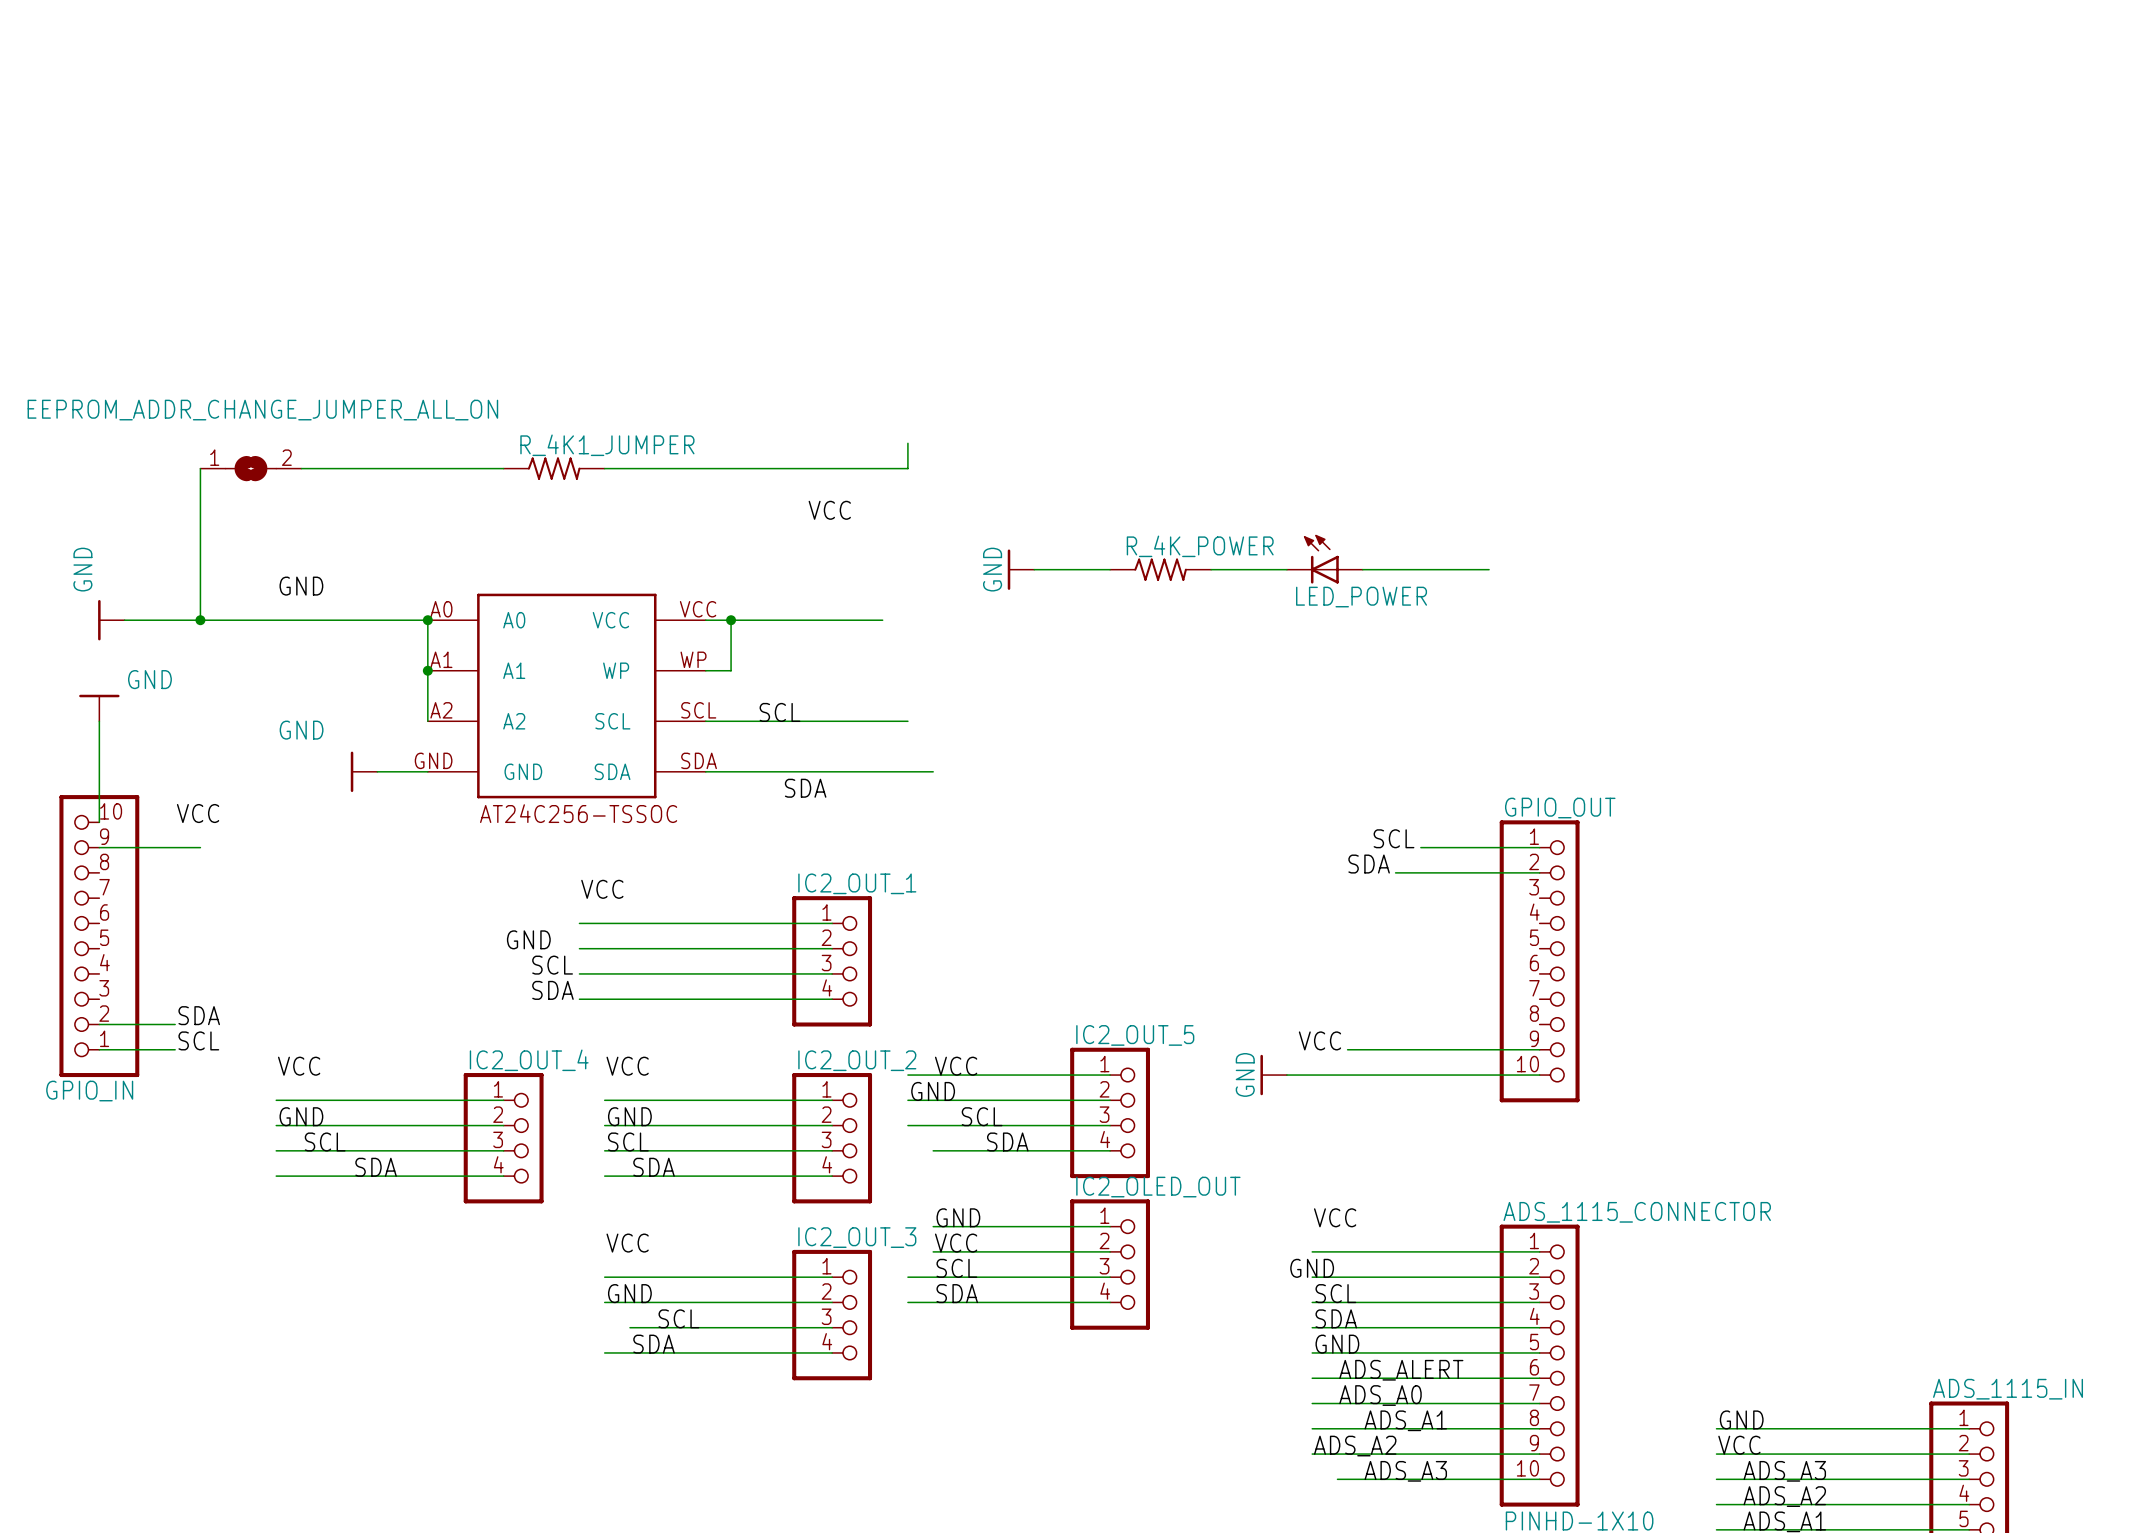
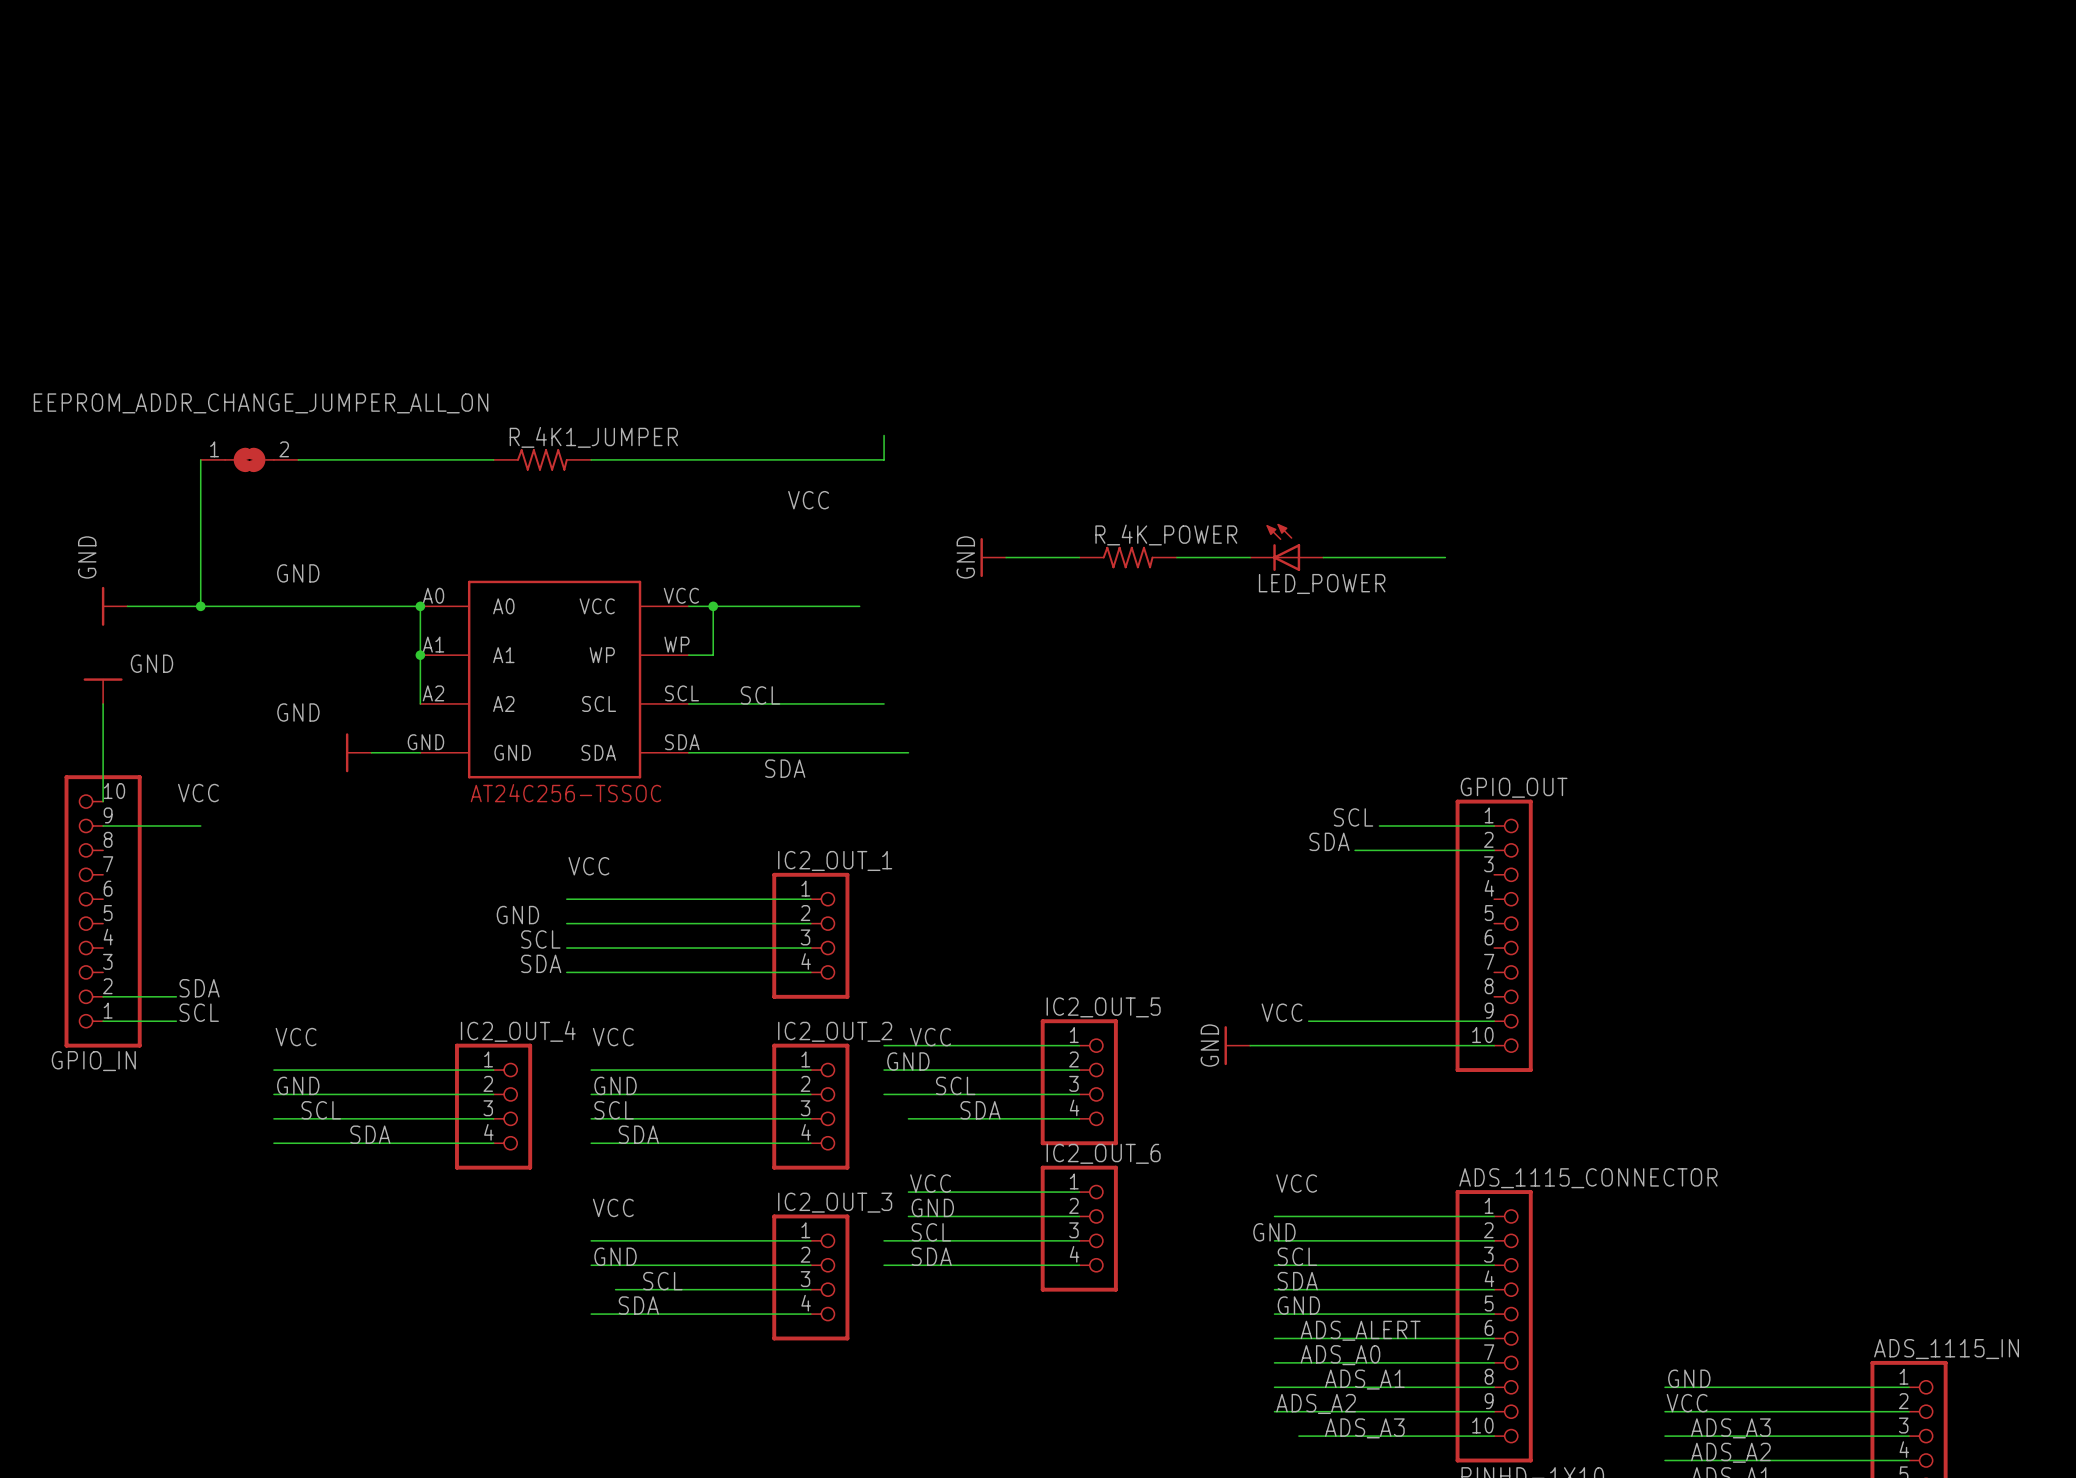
IC2_OLED_OUT name: IC2_OLED_OUT (1158, 1187) -> IC2_OUT_6 (1103, 1153)
label: GND (958, 1217) -> VCC (930, 1183)
label: VCC (956, 1243) -> GND (932, 1207)

